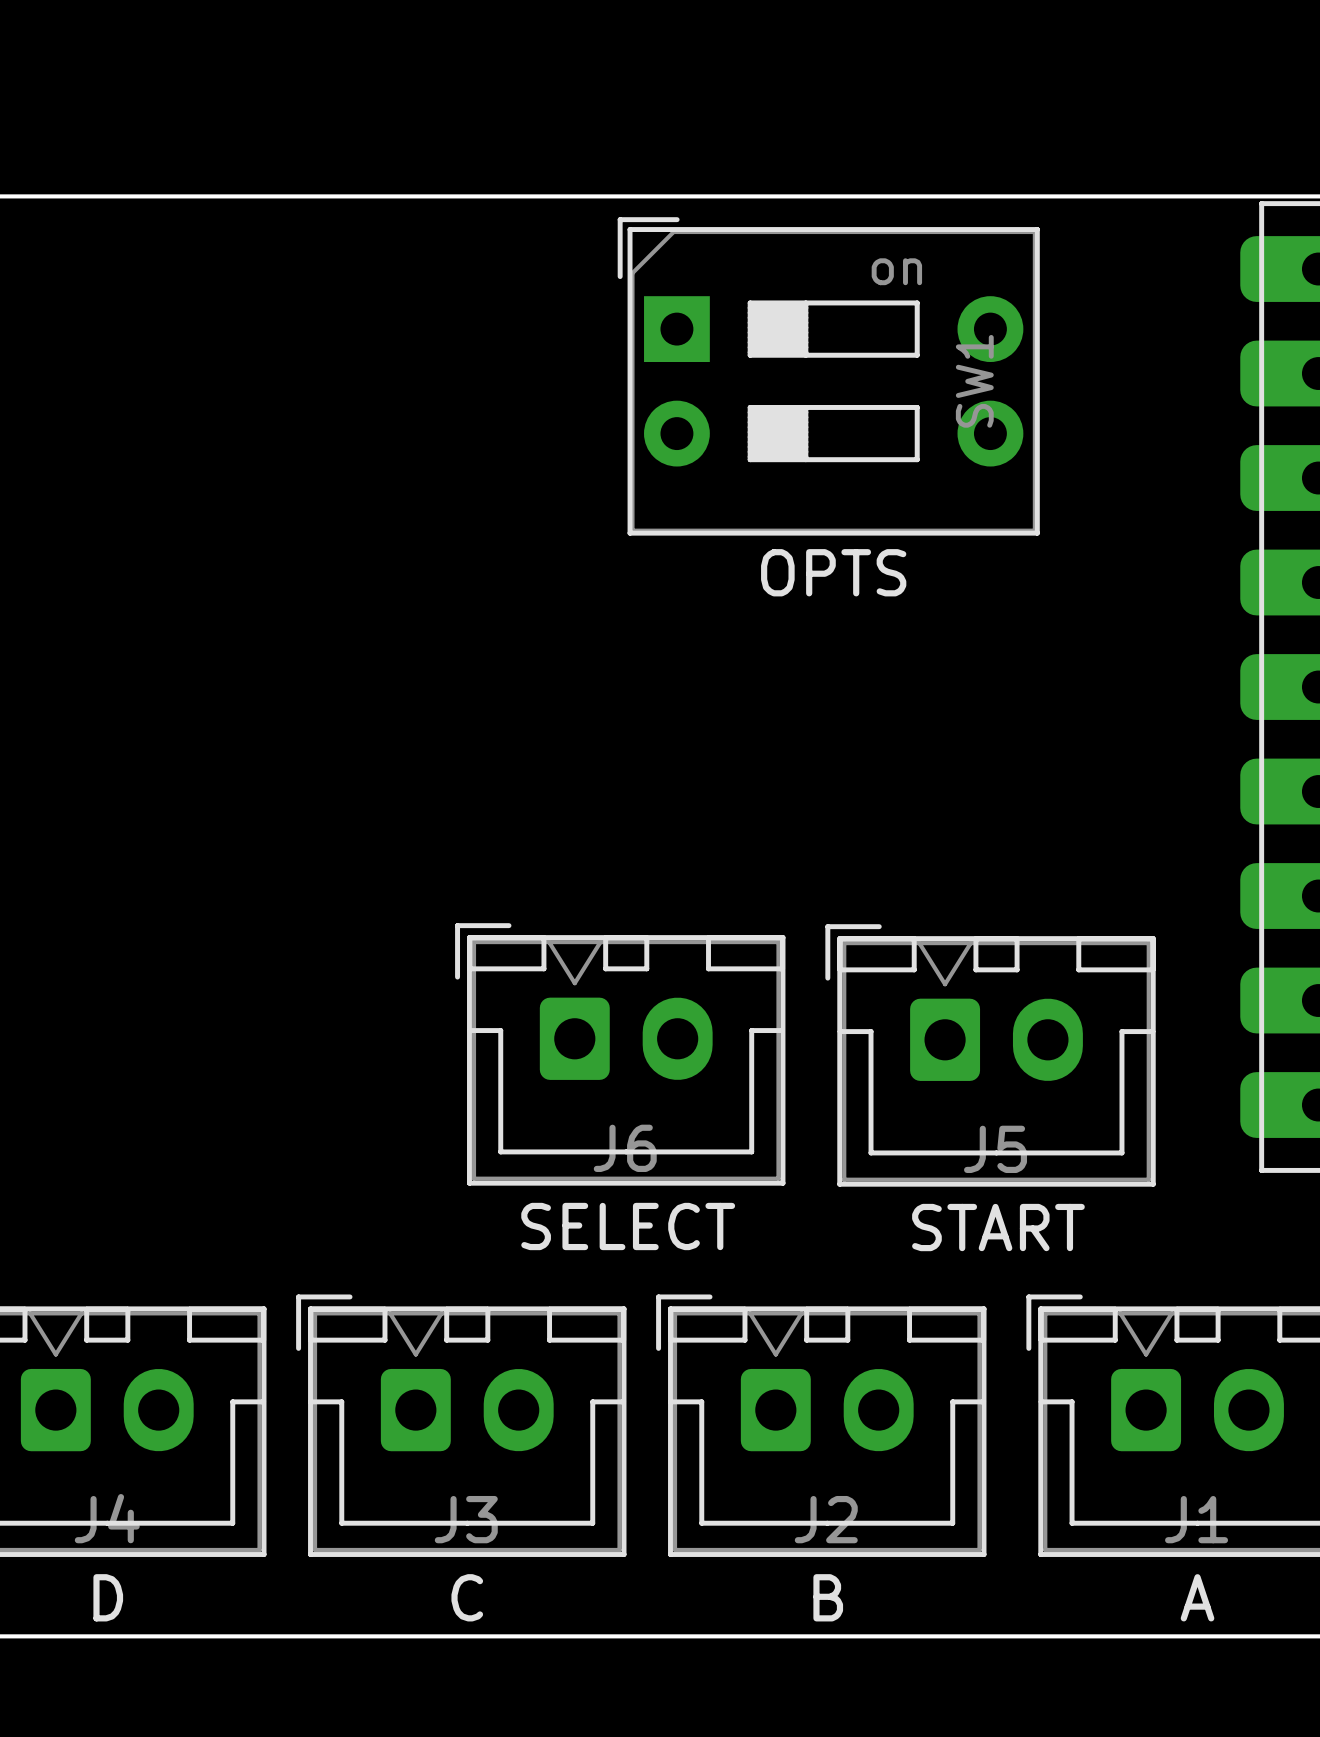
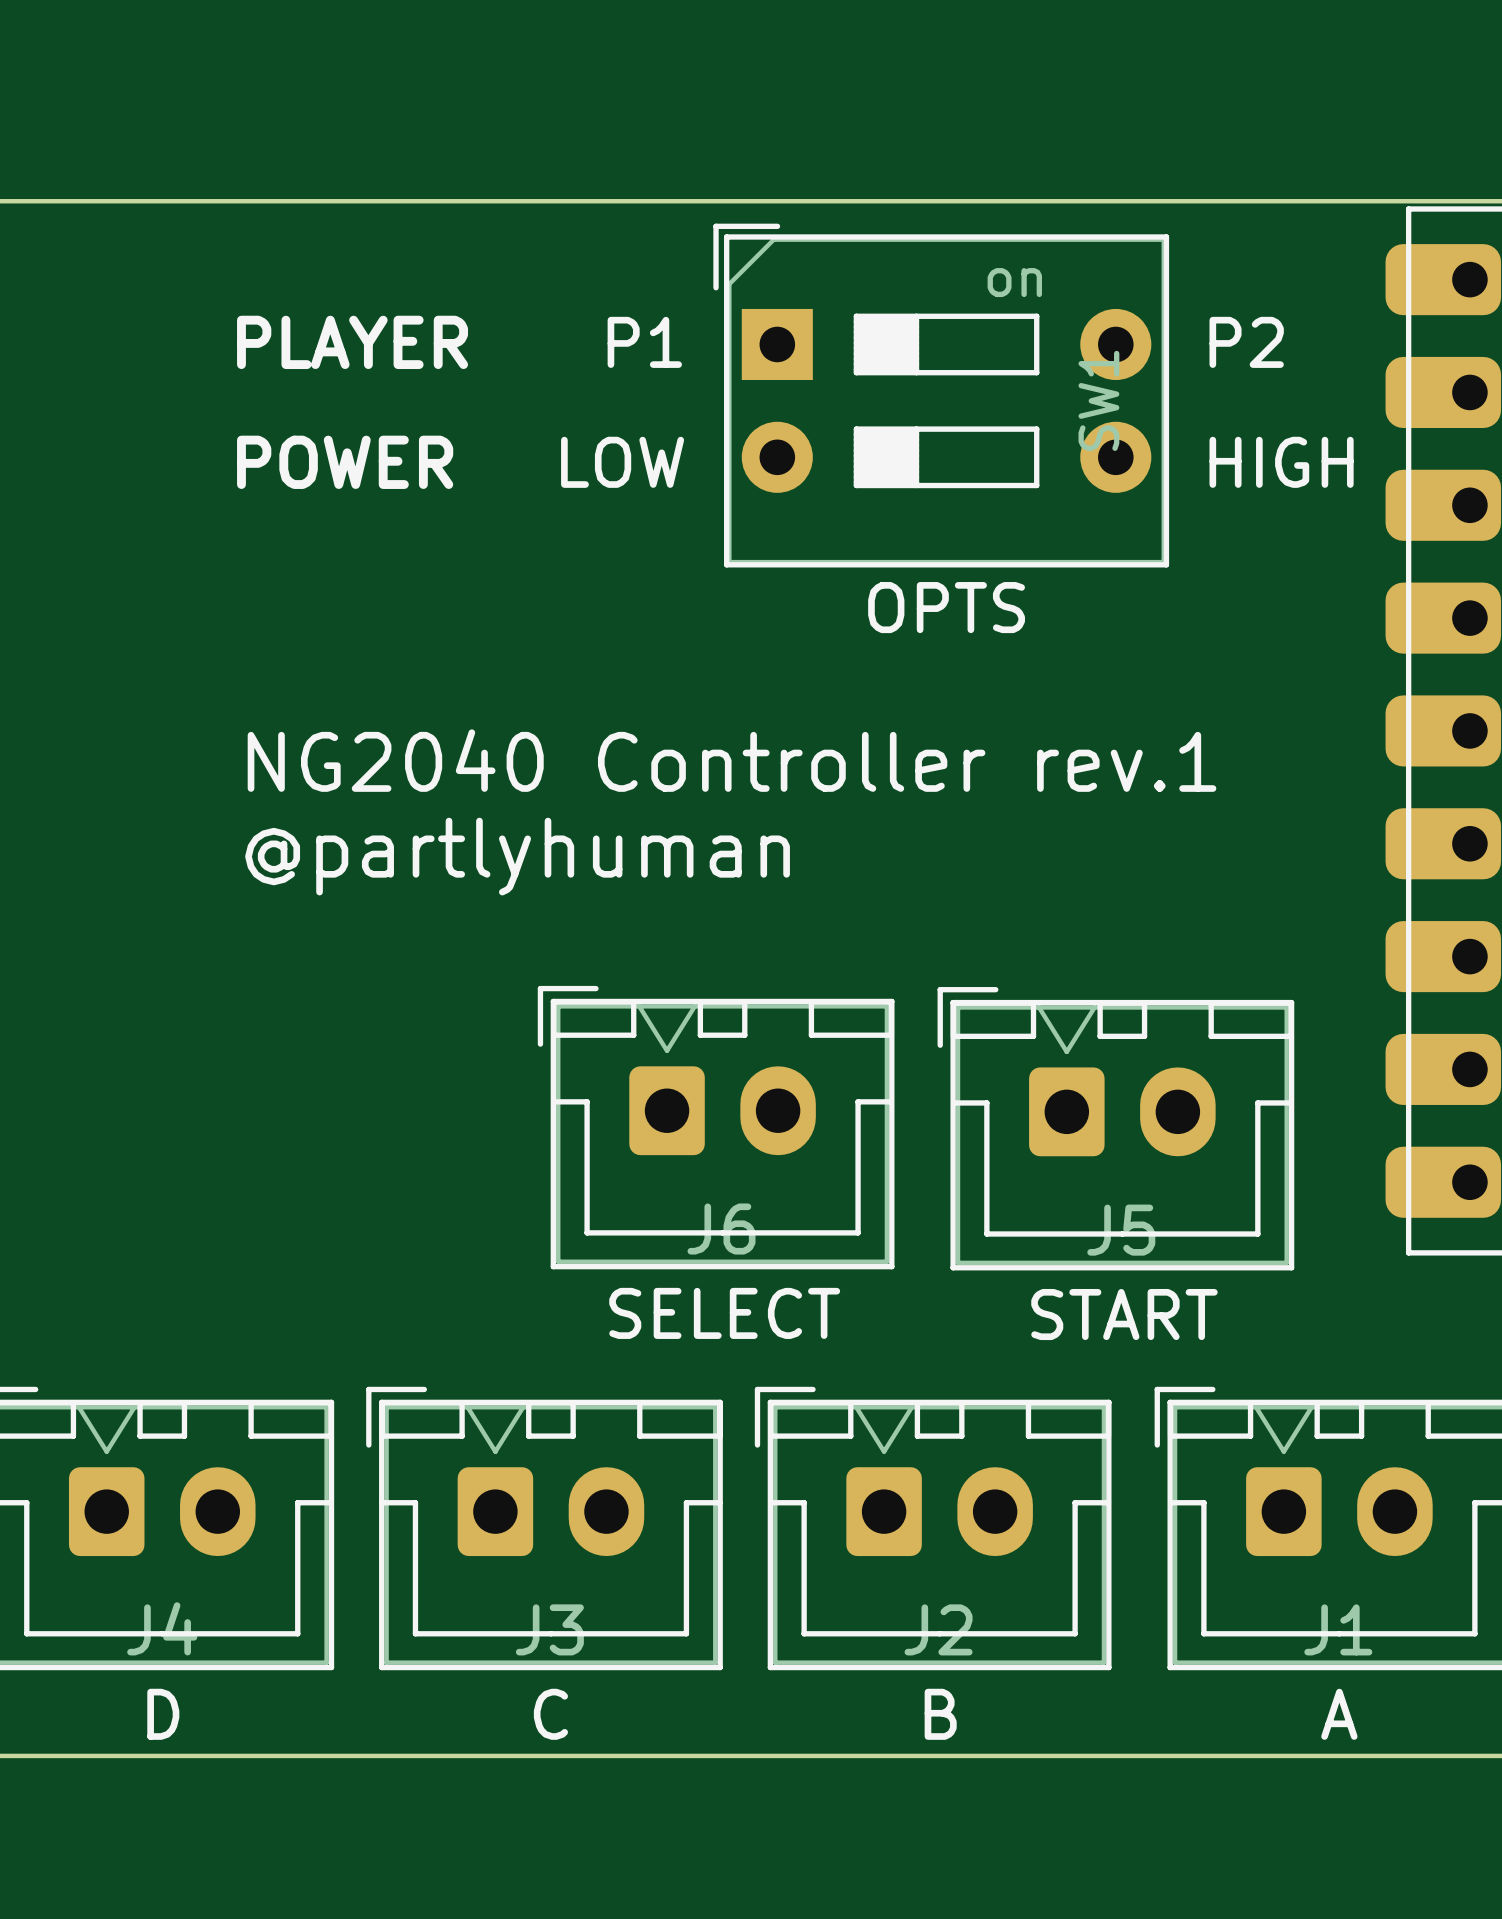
text: none -> PLAYER (352, 342)
text: none -> P1 (644, 342)
text: none -> P2 (1246, 342)
text: none -> POWER (345, 462)
text: none -> LOW (622, 462)
text: none -> HIGH (1281, 462)
text: none -> NG2040 Controller rev.1 (732, 760)
text: none -> @partlyhuman (517, 856)

